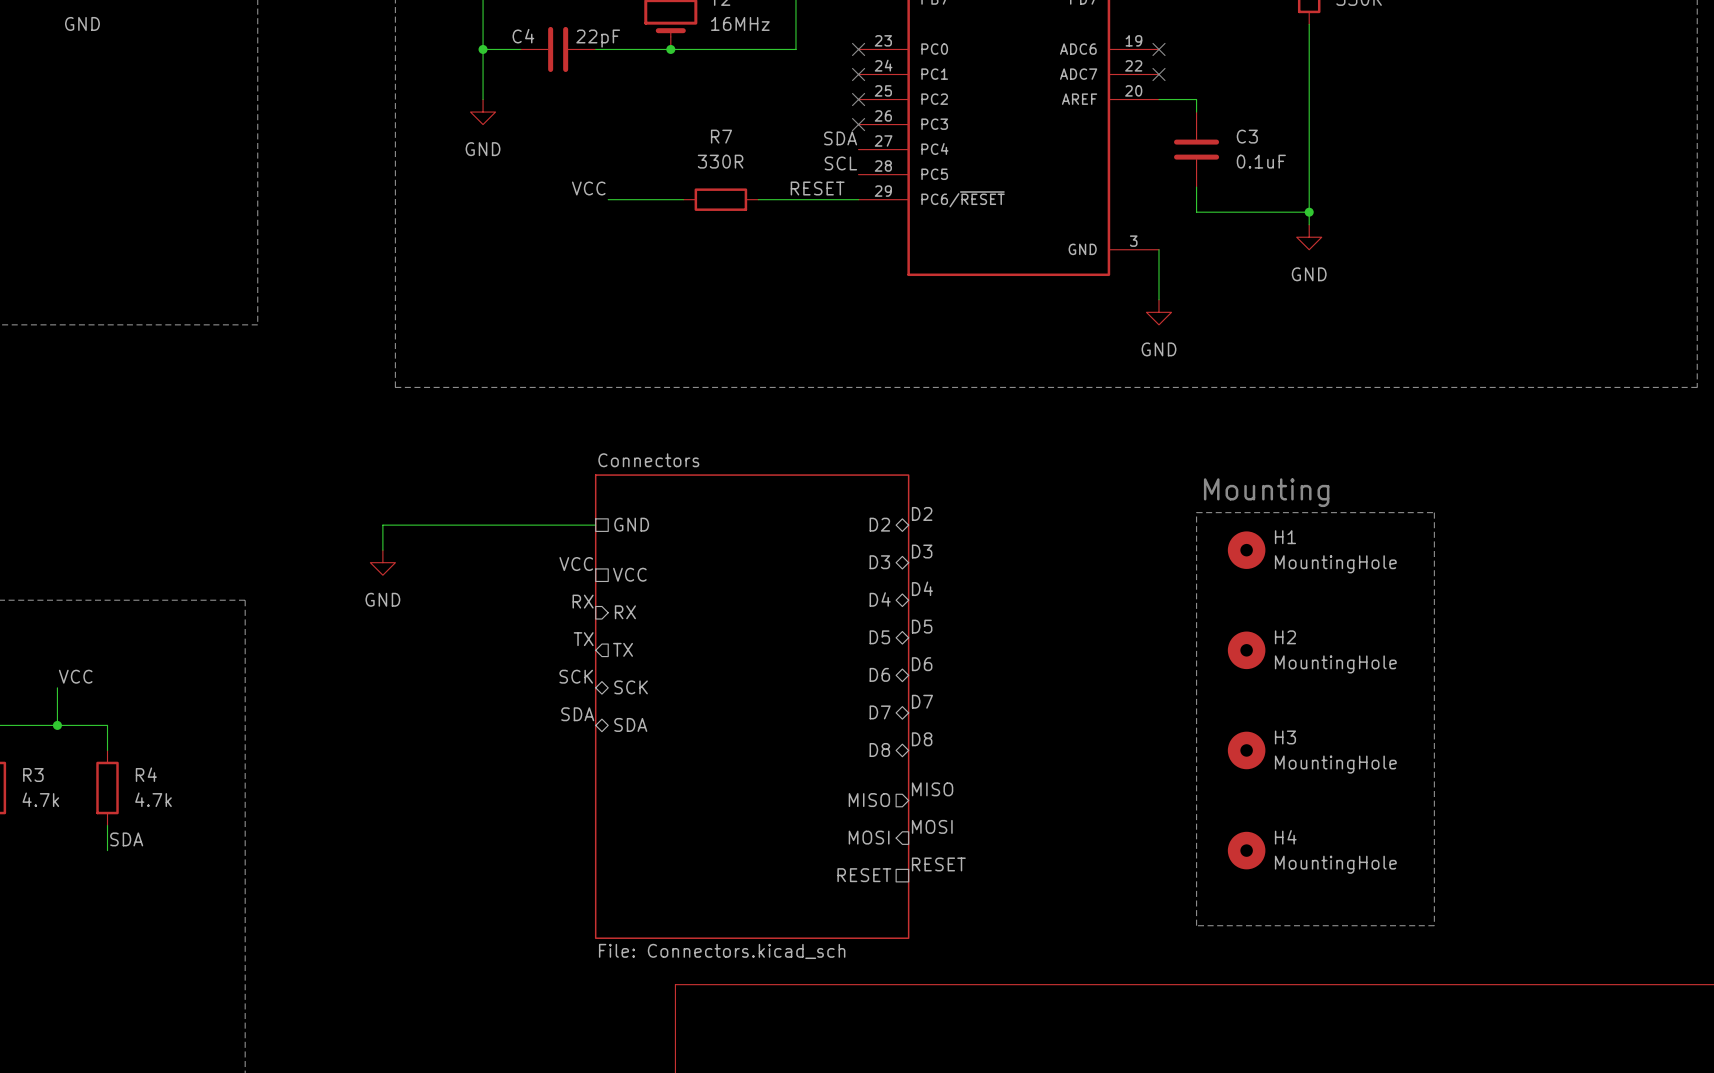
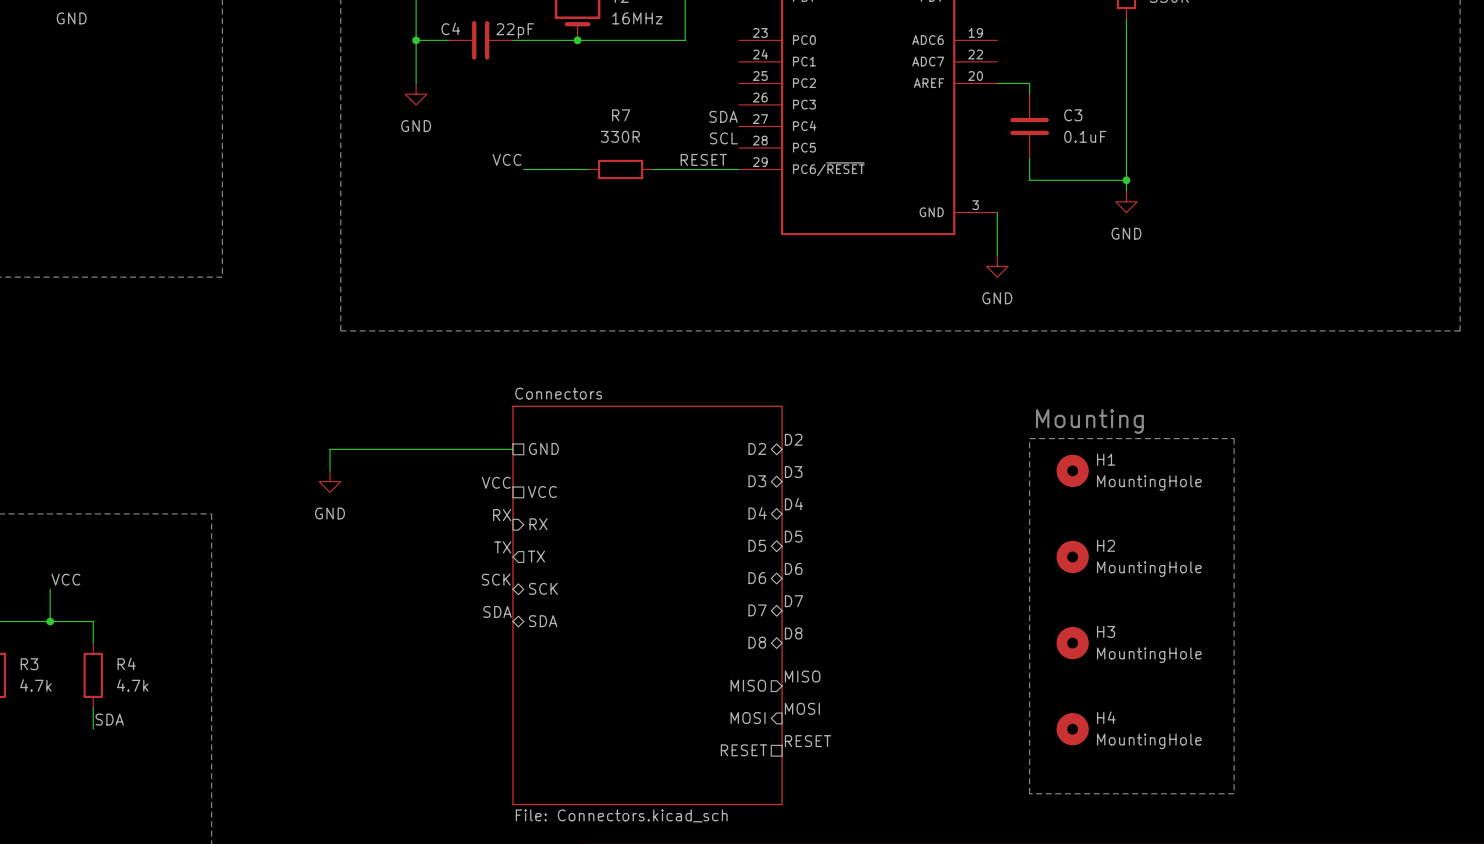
no-connect mark: (858, 49) -> none
no-connect mark: (1159, 49) -> none
no-connect mark: (858, 74) -> none
no-connect mark: (1159, 74) -> none
no-connect mark: (858, 99) -> none
no-connect mark: (858, 124) -> none

